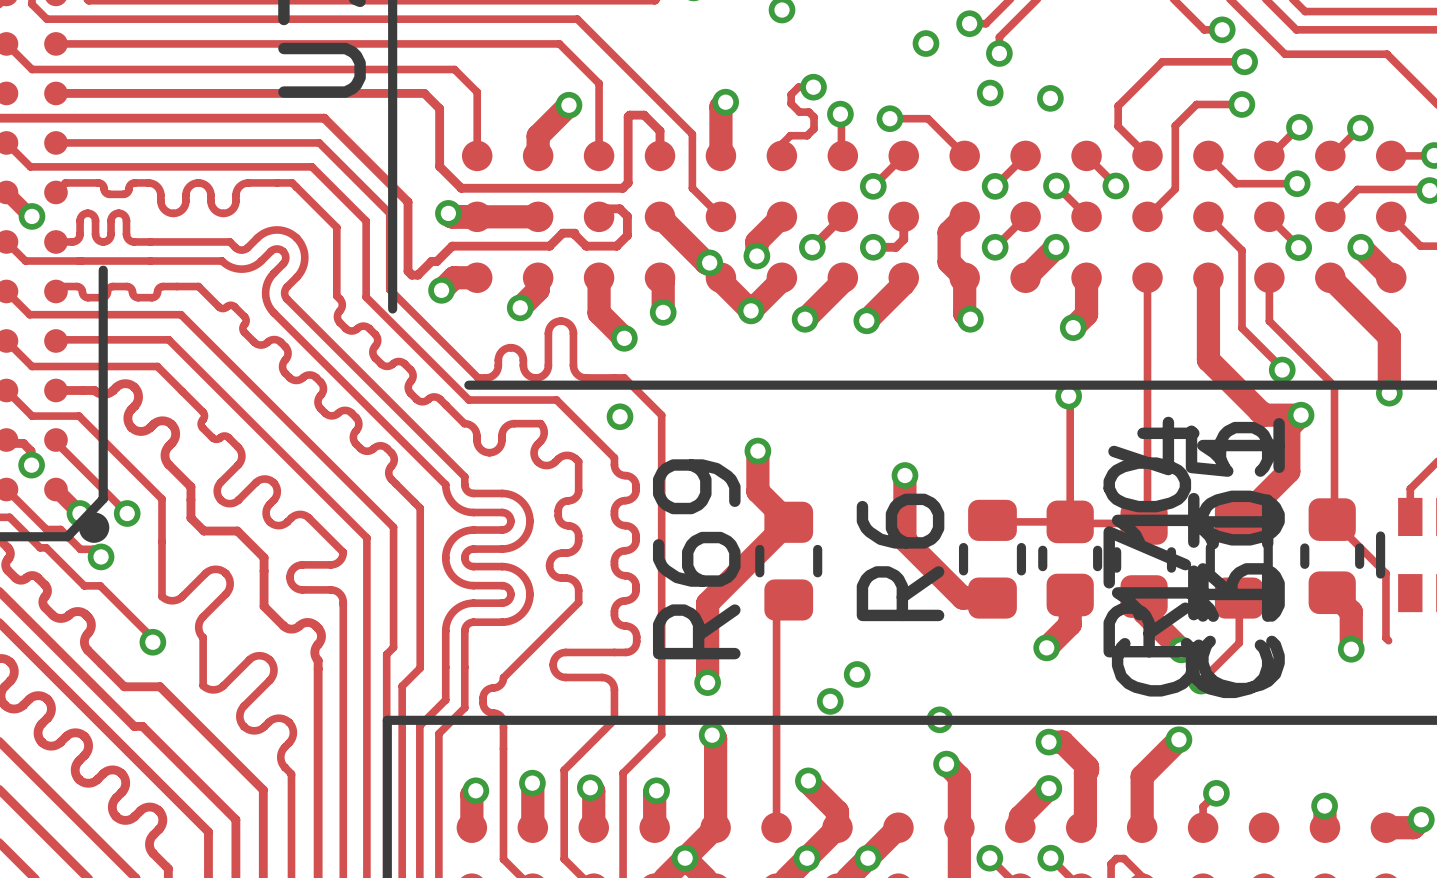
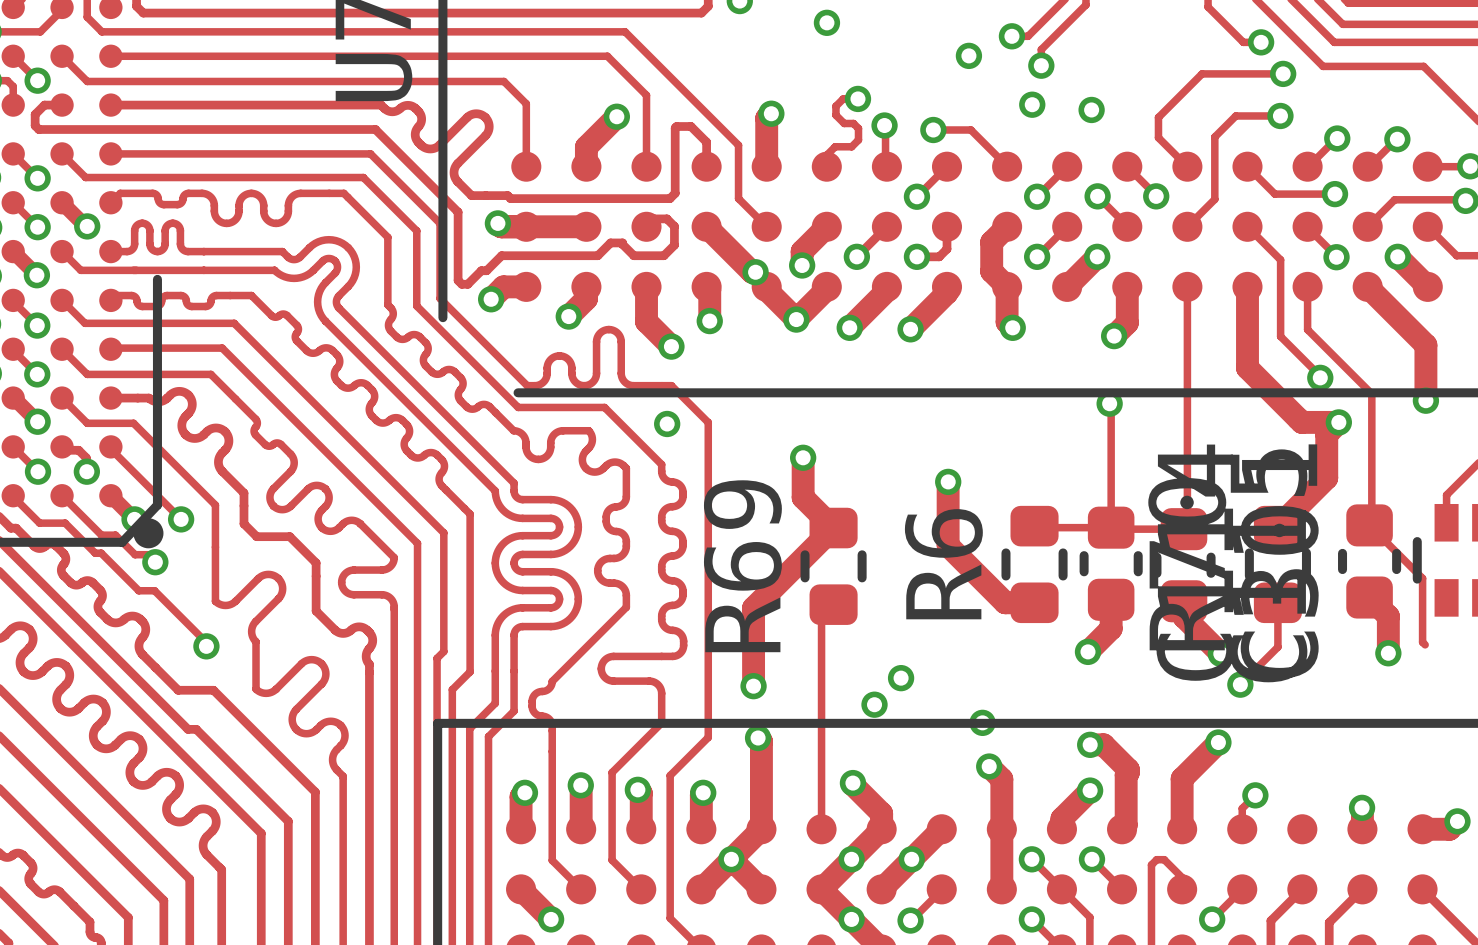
track: (329, 93) (424, 93) (439, 108) (439, 166) (458, 185) -> (381, 105) (390, 111) (406, 105) (415, 108) (421, 119) (415, 131) (415, 138) (422, 146) (428, 148) (438, 146) (469, 115) (476, 113) (484, 116) (489, 124) (487, 133) (456, 164) (454, 175) (471, 195) (507, 195)

